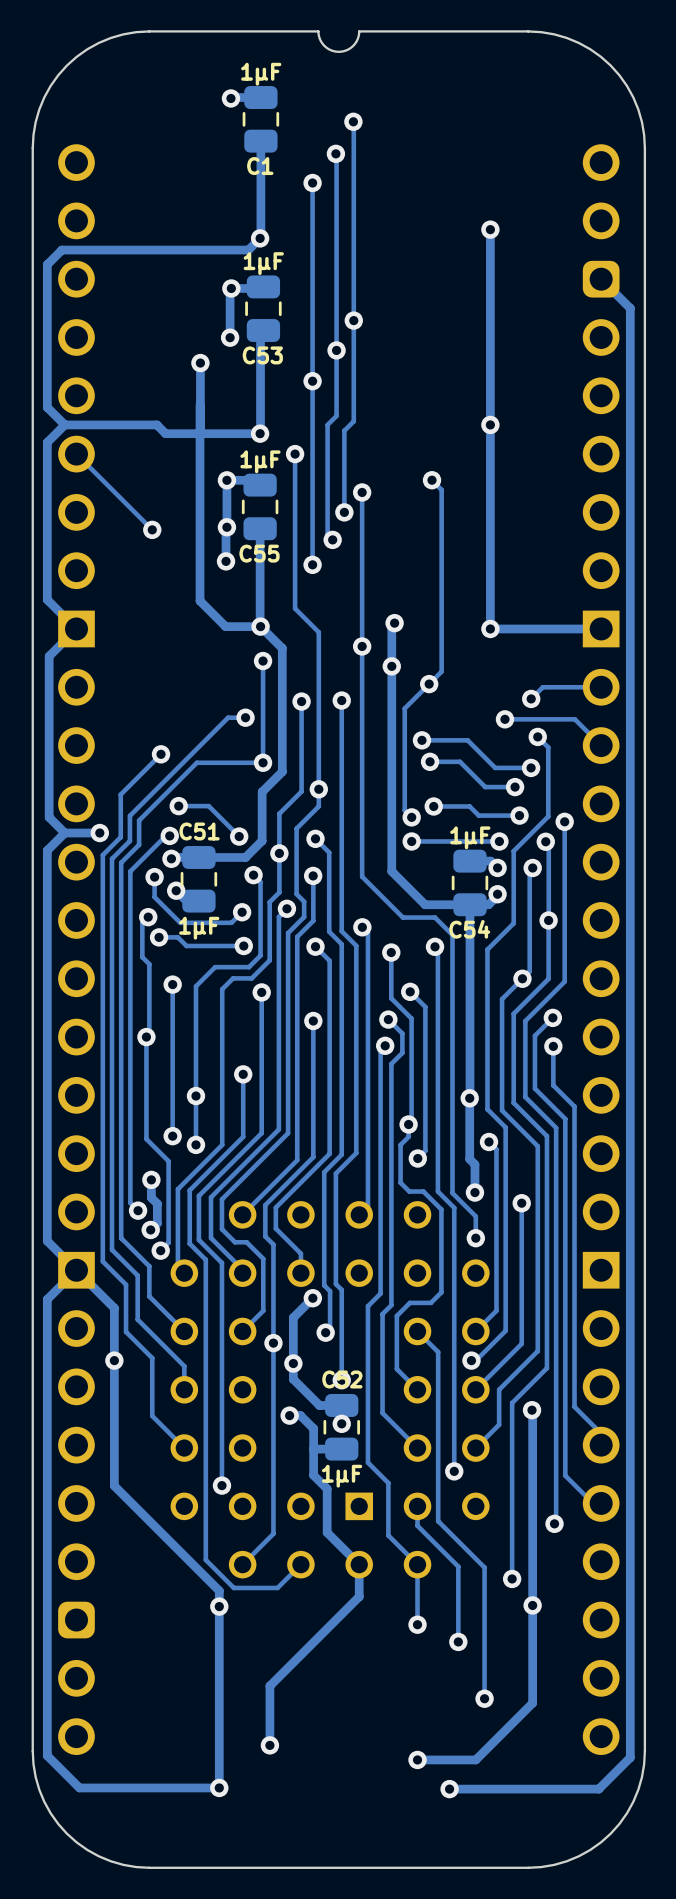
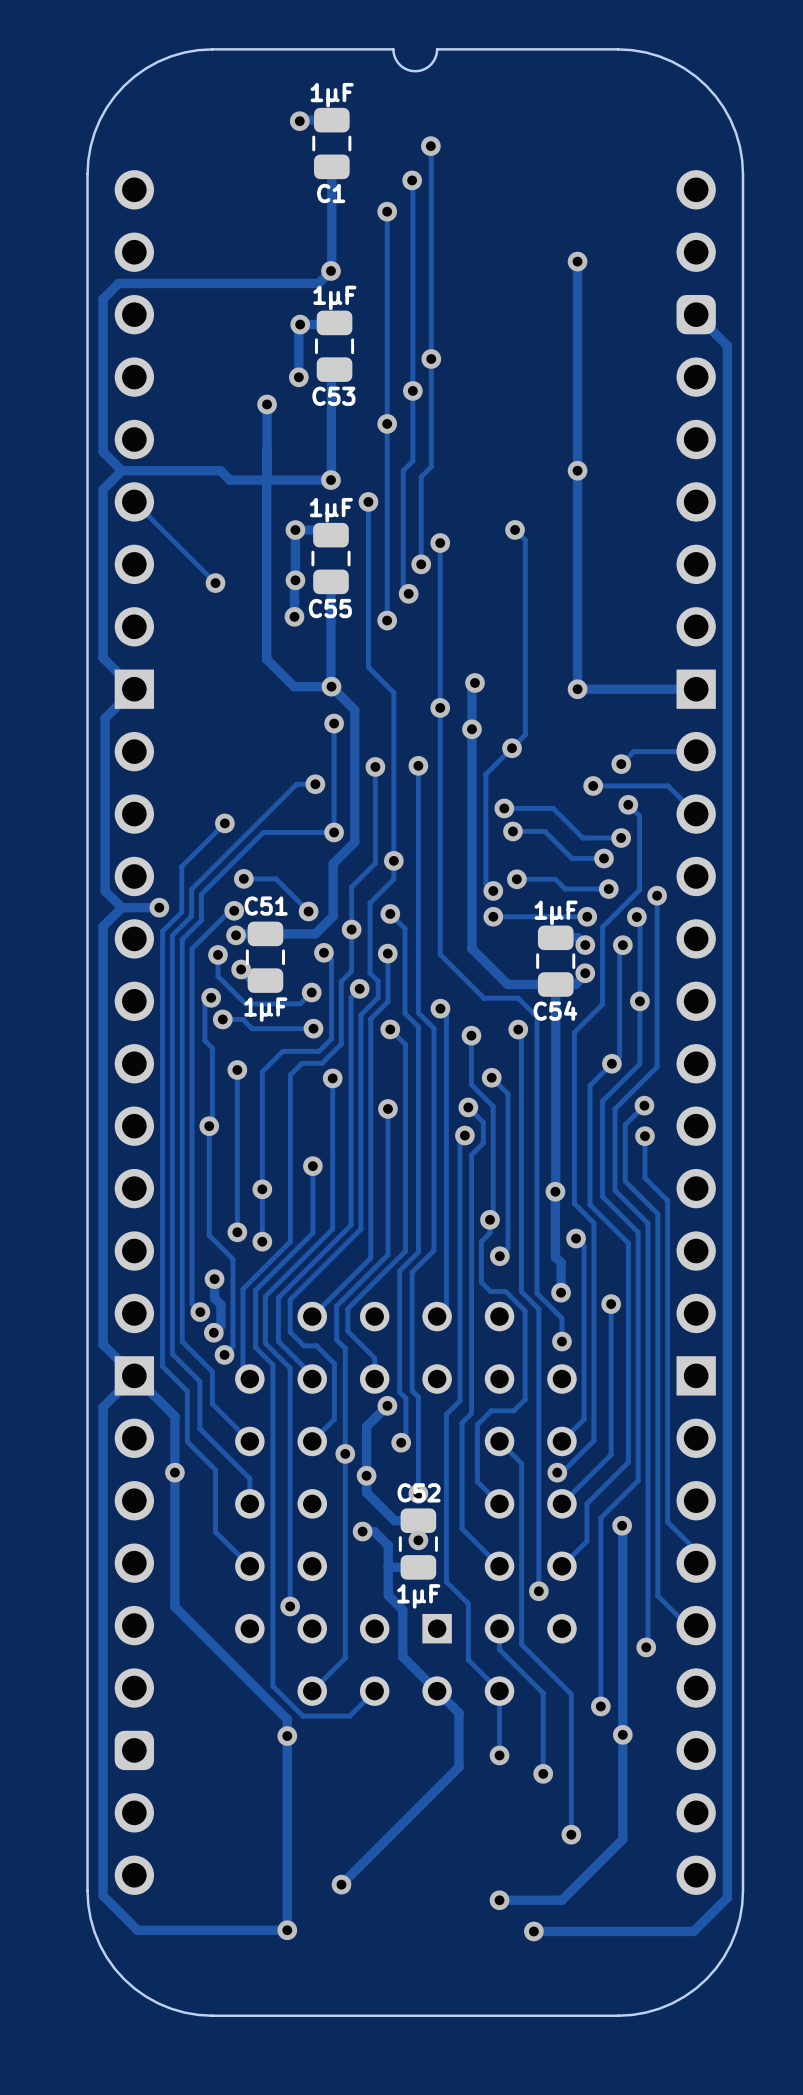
track: (359, 1564) (359, 1596) (269, 1686) (269, 1745) -> (437, 1691) (458, 1712) (458, 1767) (341, 1884)

